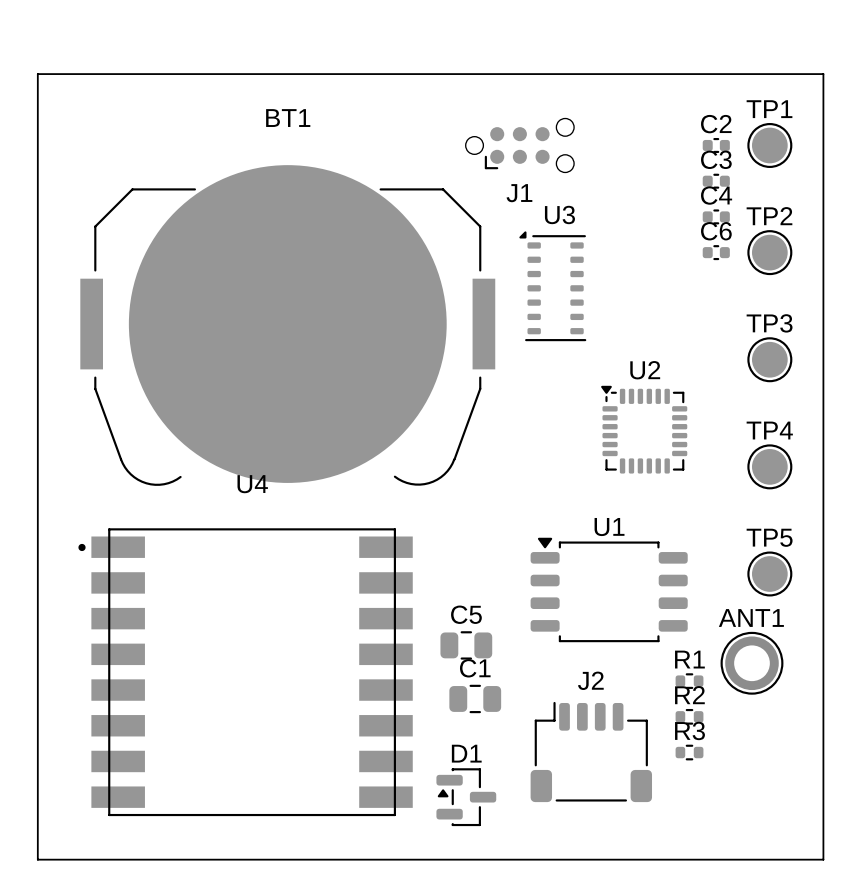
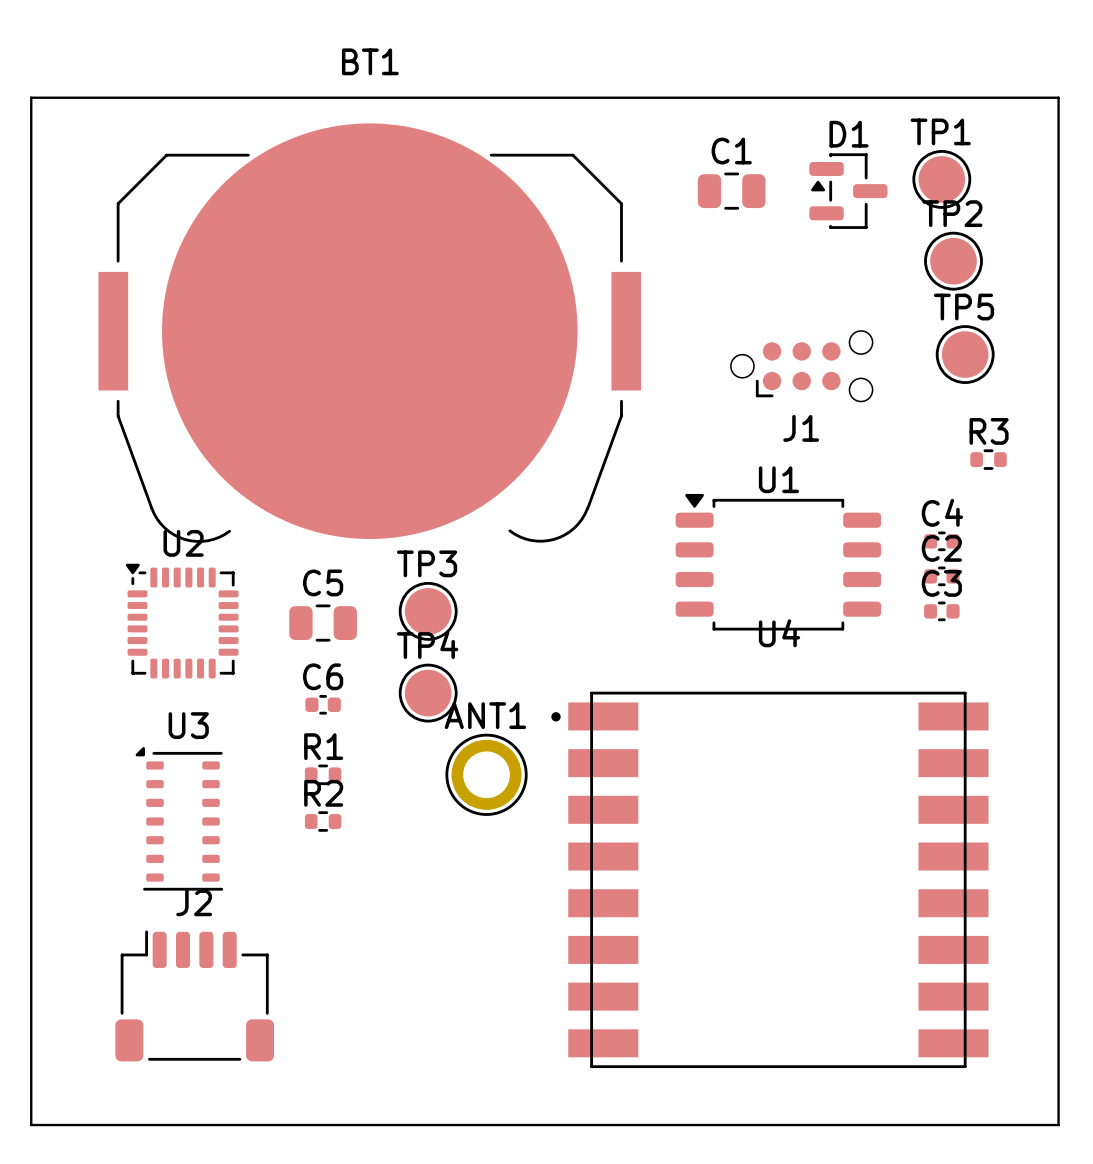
J1 position: (519, 145) -> (801, 366)
C2 position: (716, 145) -> (941, 576)
TP1 position: (769, 145) -> (941, 179)
C3 position: (716, 181) -> (941, 611)
C4 position: (716, 216) -> (941, 541)
C6 position: (716, 252) -> (323, 704)
TP2 position: (769, 252) -> (953, 261)
U3 position: (552, 286) -> (179, 818)
BT1 position: (287, 325) -> (369, 333)
TP3 position: (769, 359) -> (428, 611)
U2 position: (644, 429) -> (182, 621)
TP4 position: (769, 466) -> (428, 693)
TP5 position: (769, 573) -> (965, 354)
U1 position: (609, 589) -> (778, 562)
C5 position: (466, 645) -> (323, 623)
ANT1 position: (751, 663) -> (486, 774)
U4 position: (245, 672) -> (769, 879)
R1 position: (689, 681) -> (323, 774)
C1 position: (475, 698) -> (731, 191)
R2 position: (689, 716) -> (323, 821)
J2 position: (591, 752) -> (194, 995)
R3 position: (689, 752) -> (988, 459)
D1 position: (466, 797) -> (848, 191)

